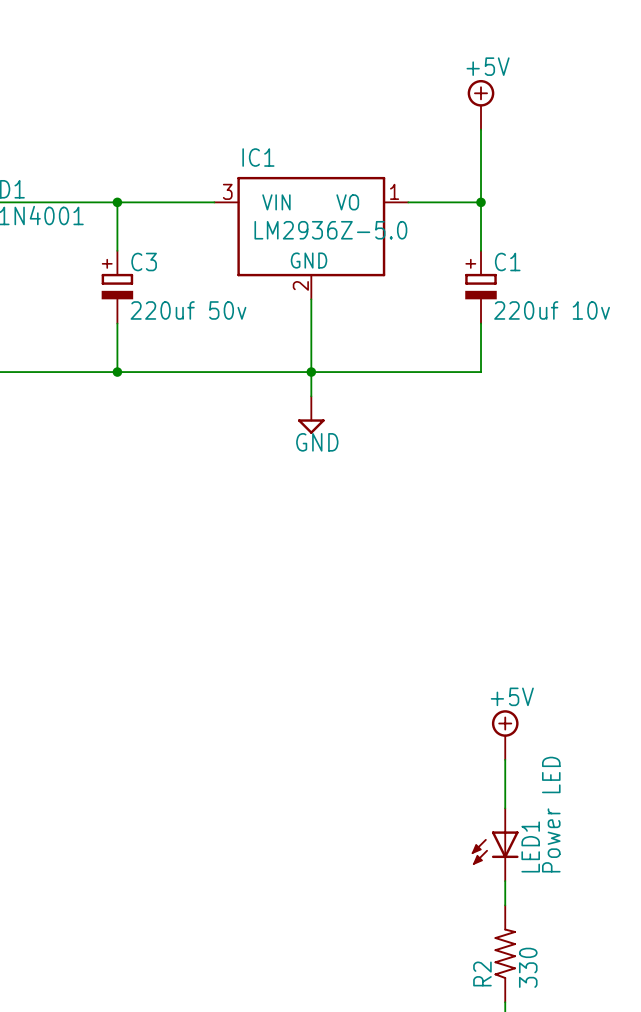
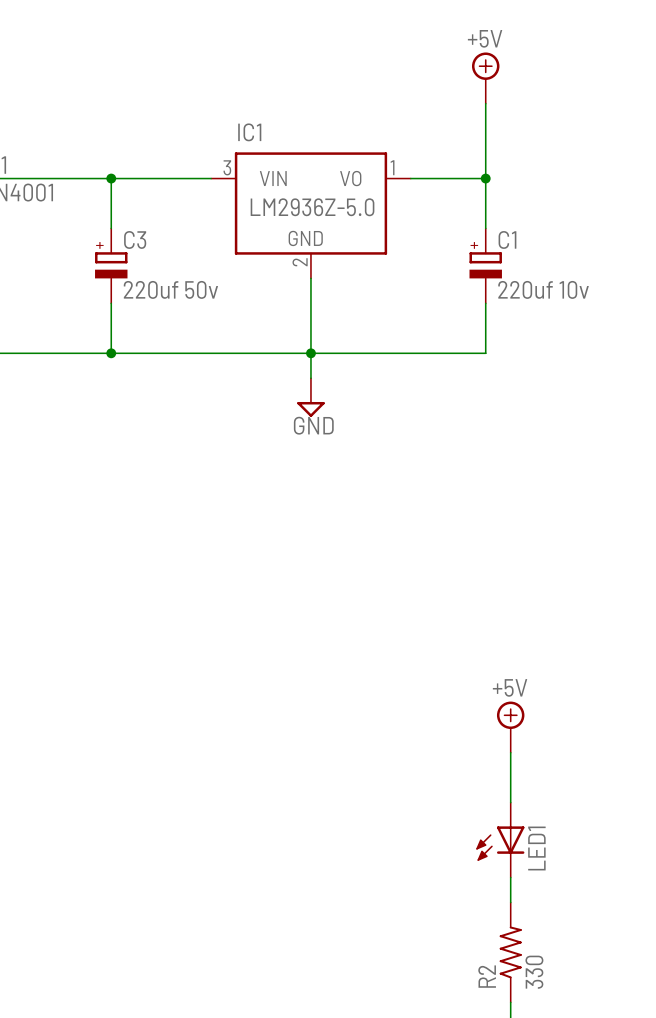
LED1 value: Power LED (551, 814) -> none

